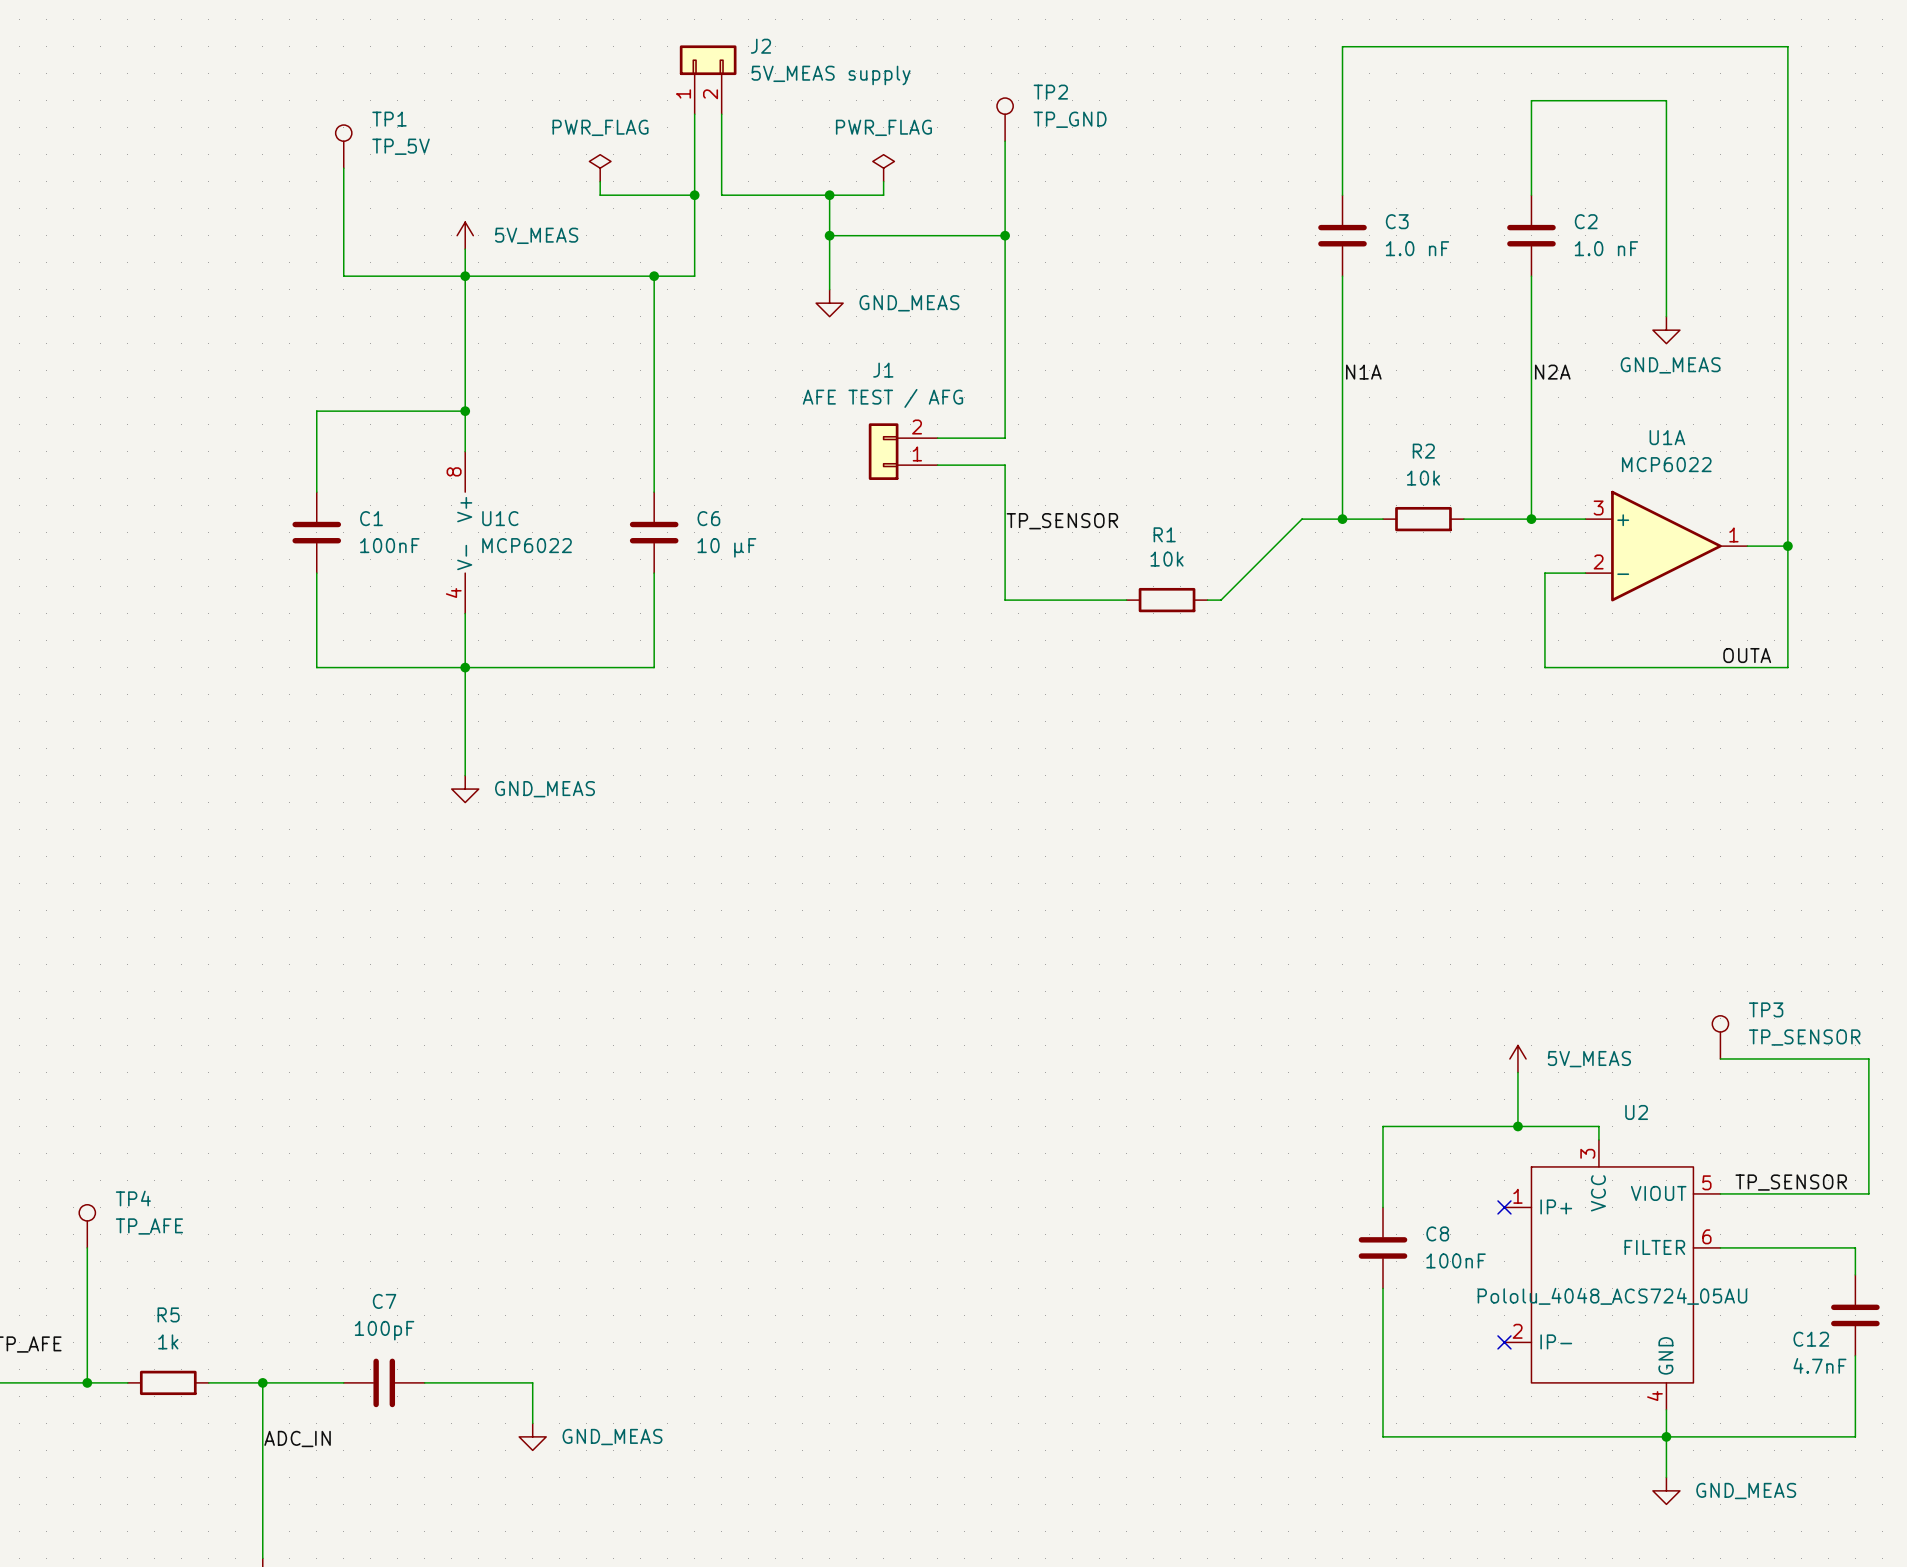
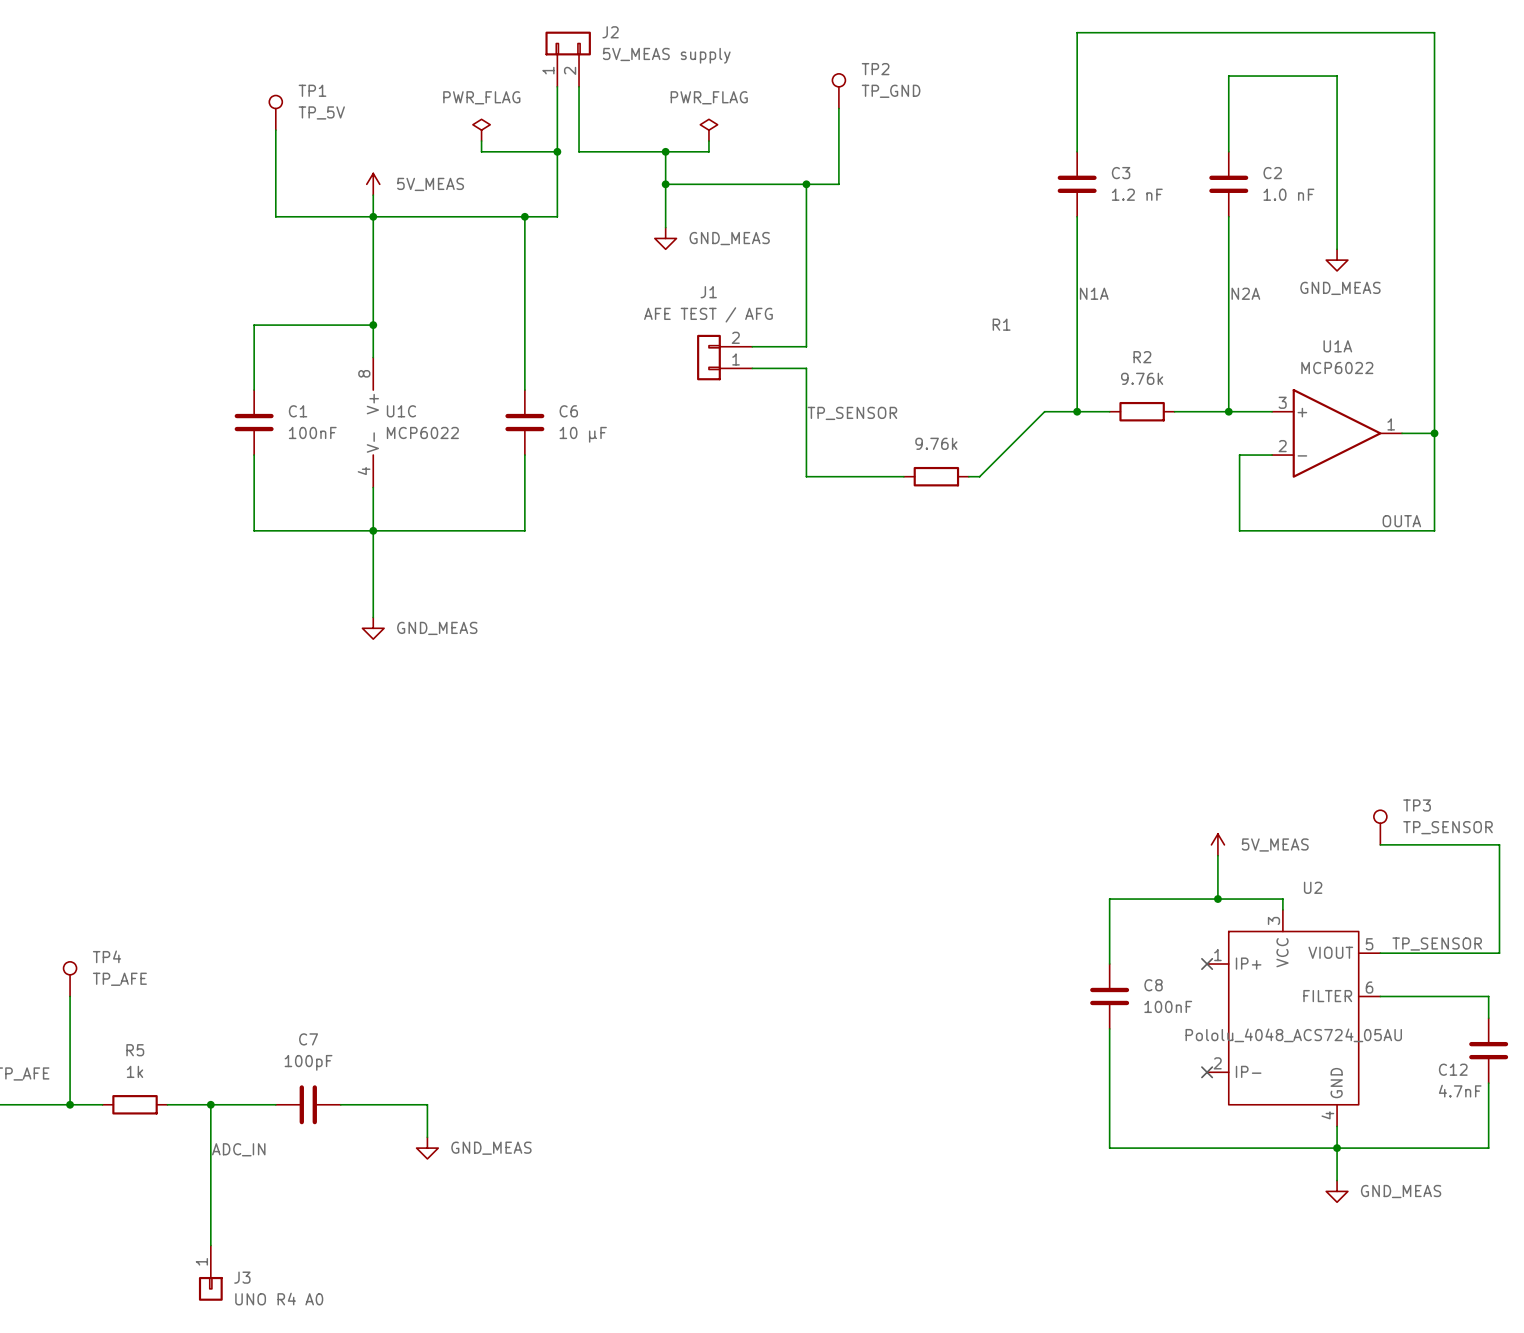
TP2 position: (1005, 119) -> (838, 91)
wire: (1005, 141) (1005, 235) -> (838, 108) (838, 184) (806, 184)
C3 value: 1.0 nF (1417, 248) -> 1.2 nF (1137, 194)
R2 value: 10k (1423, 478) -> 9.76k (1142, 378)
R1 name position: R1 (1164, 534) -> R1 (1001, 324)
R1 value: 10k (1167, 559) -> 9.76k (936, 443)

